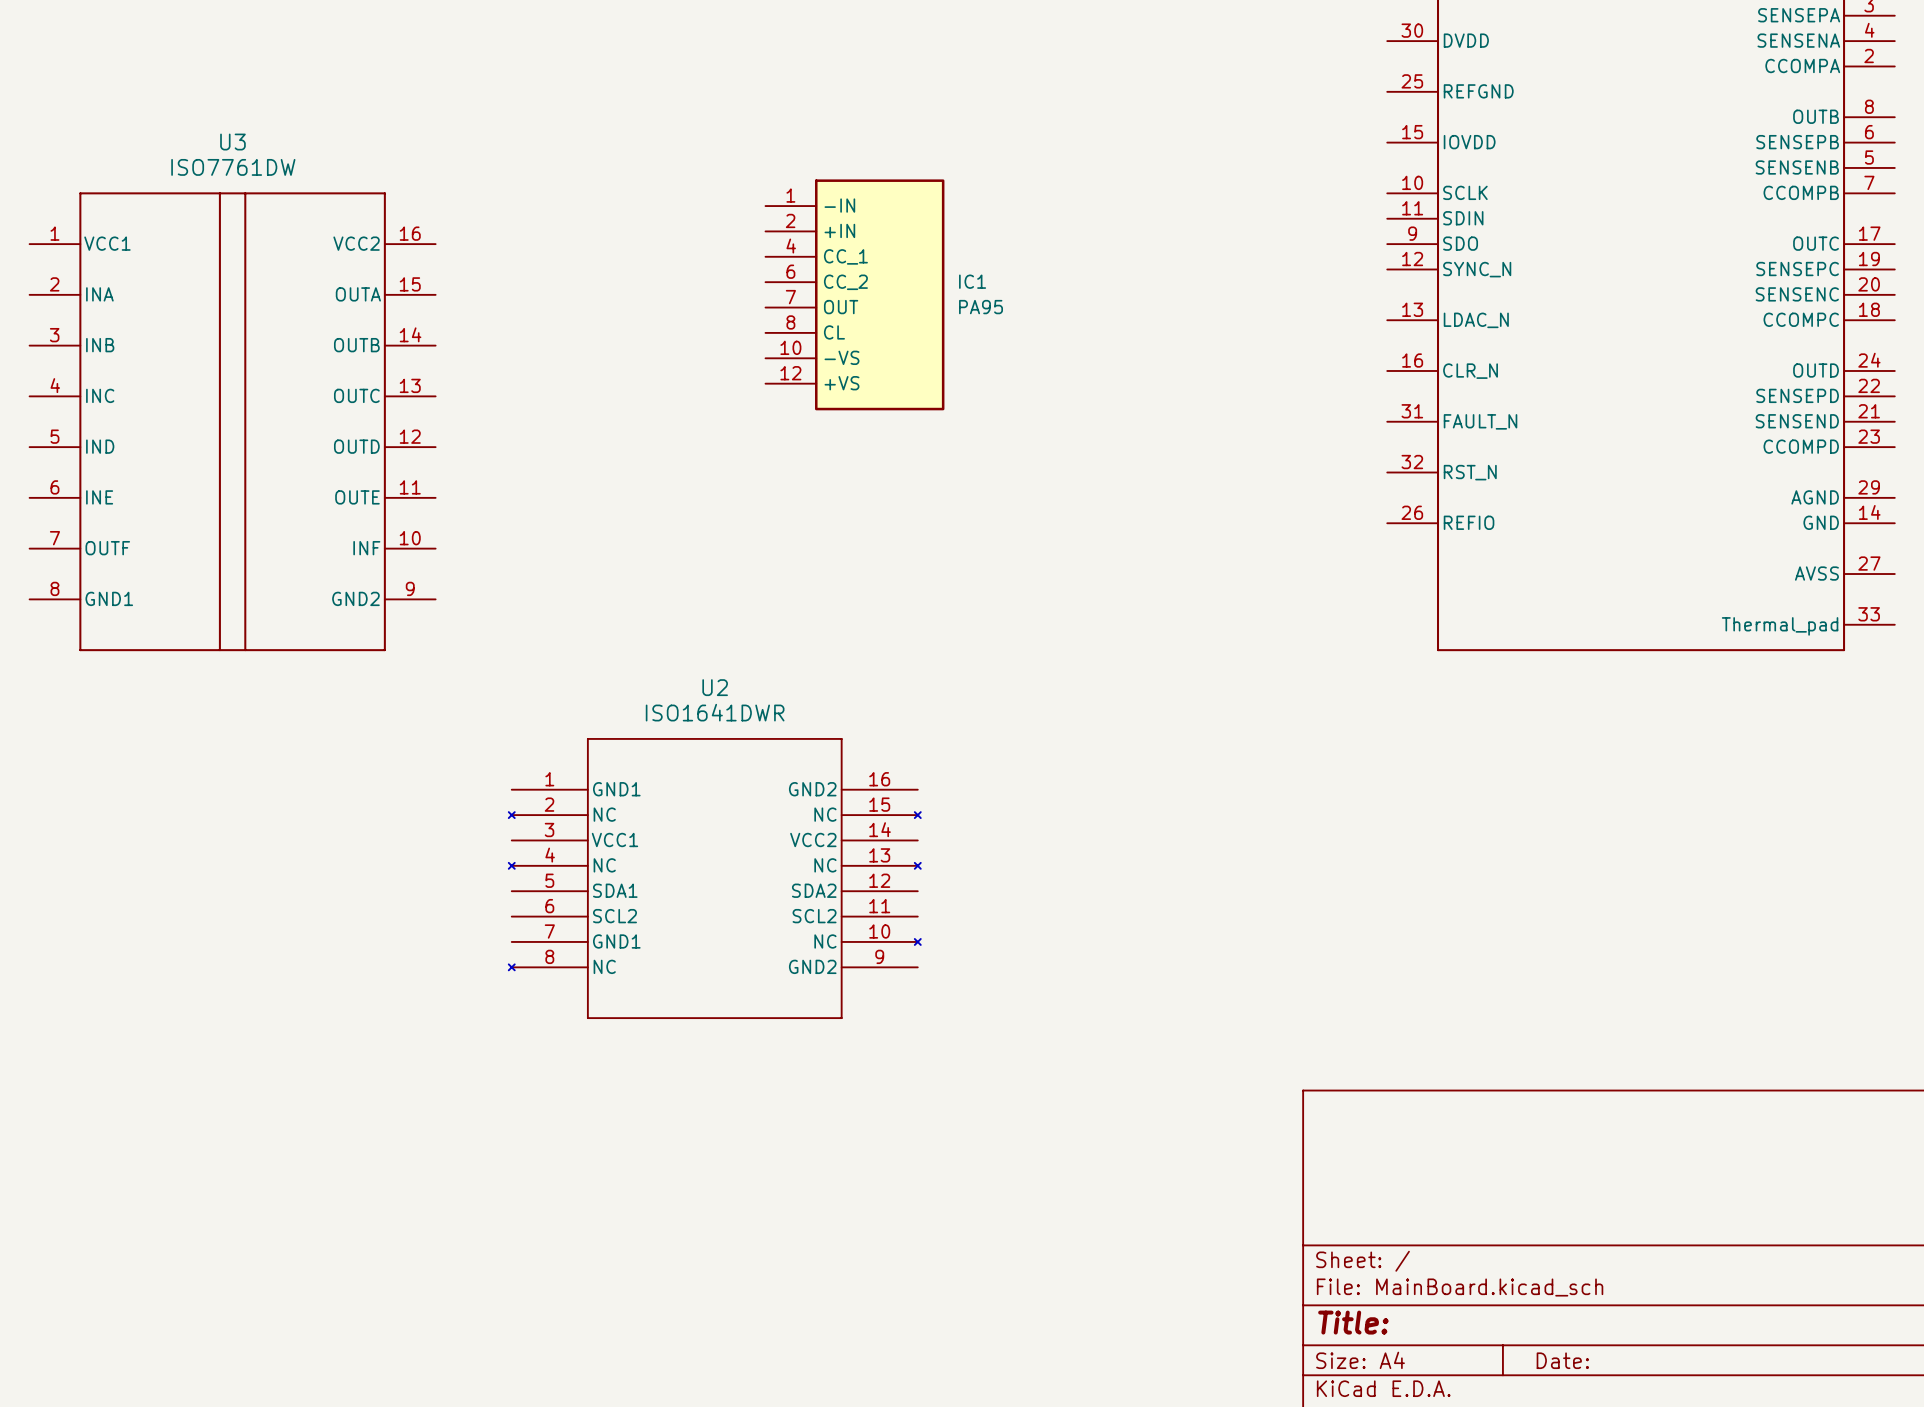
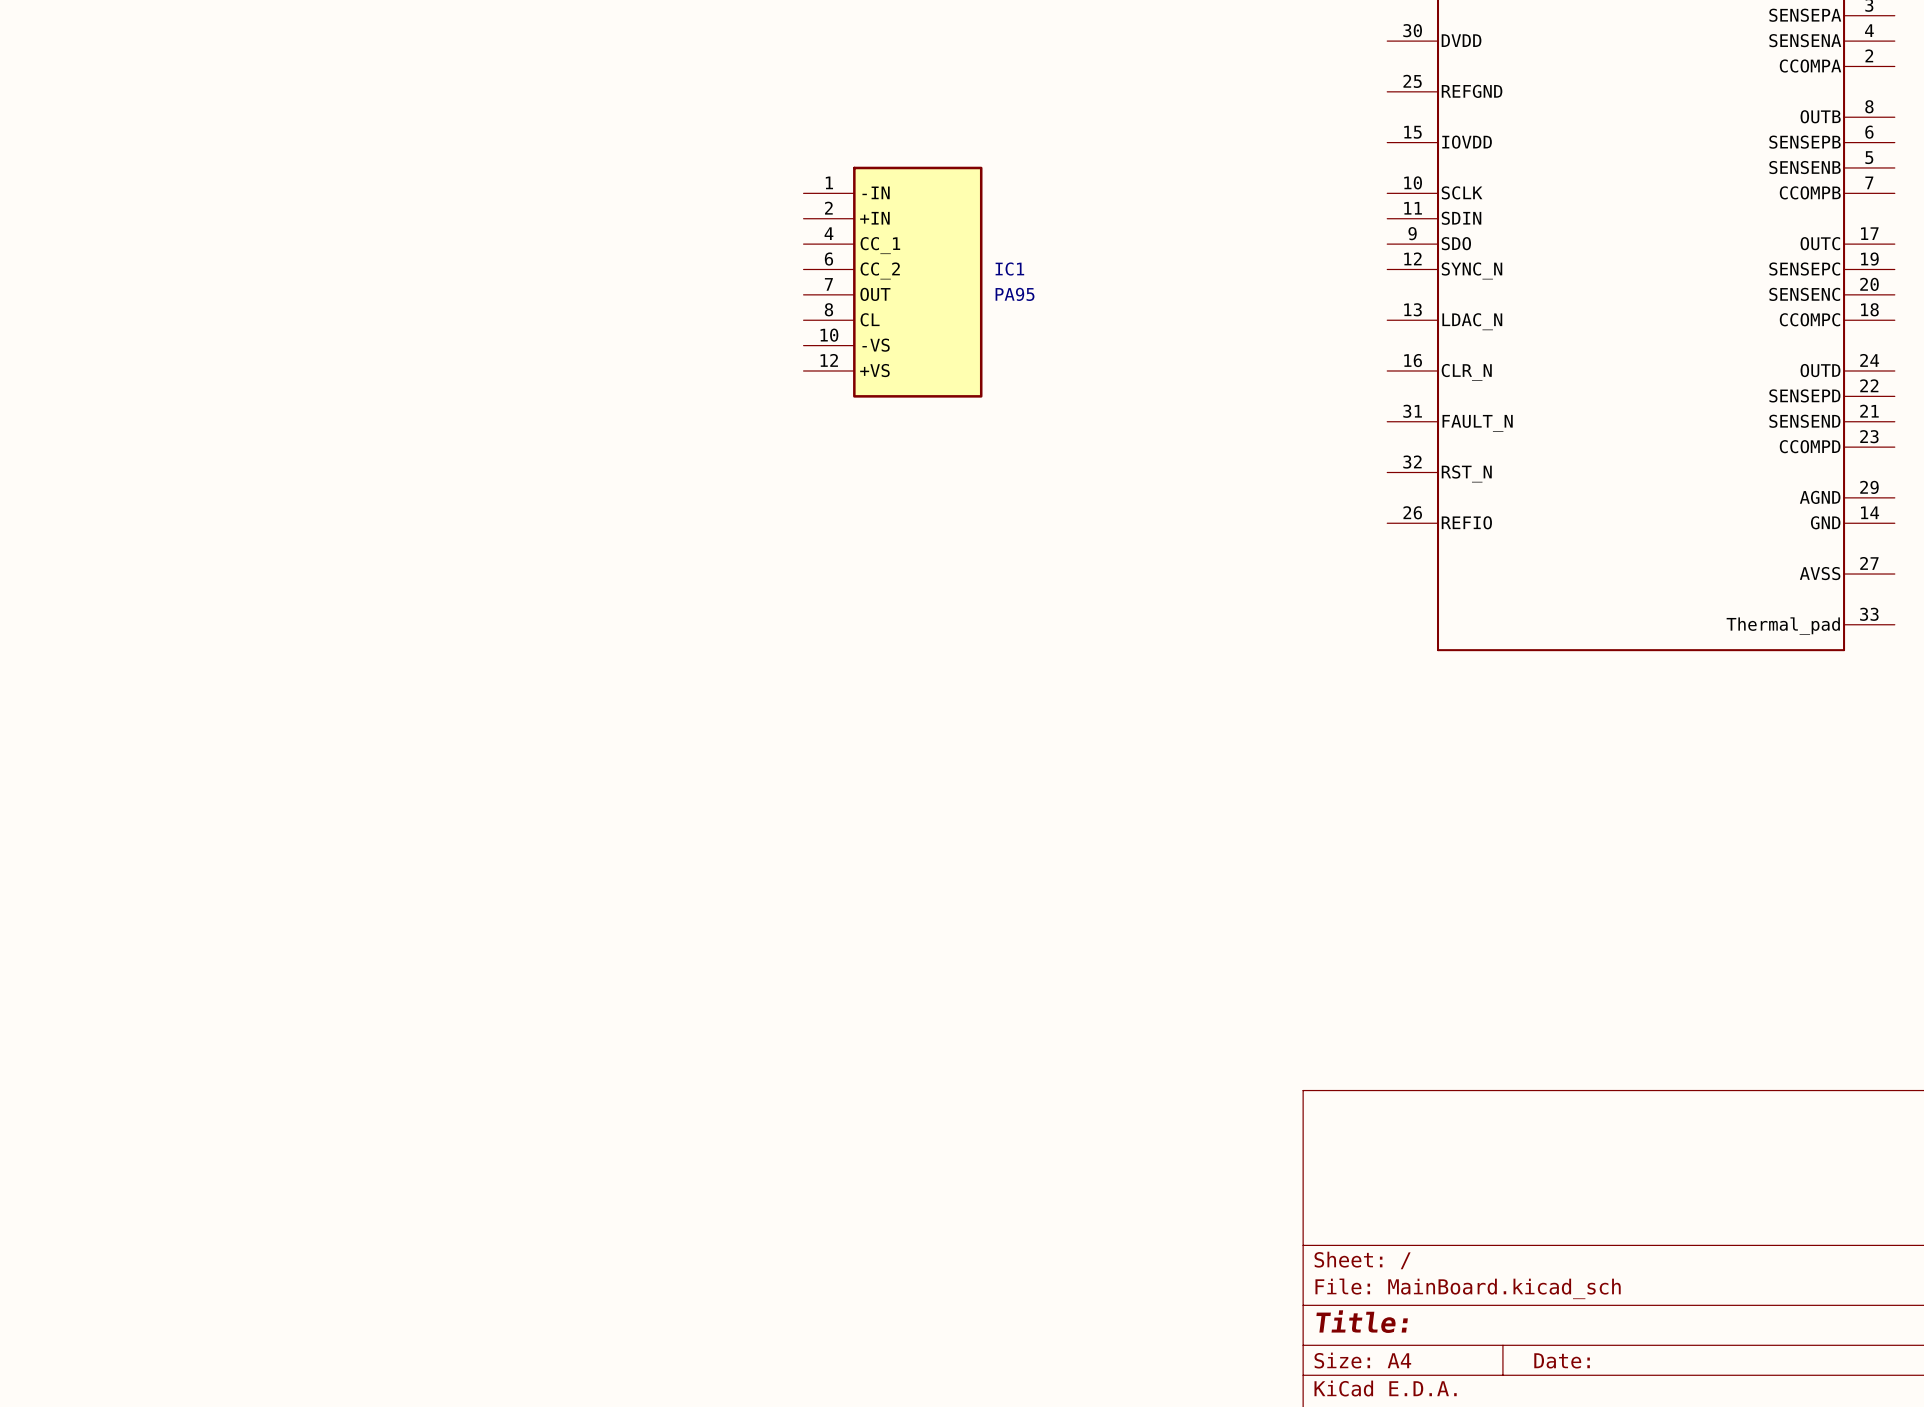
IC1 position: (854, 294) -> (893, 282)
U3: ISO7761DW (232, 421) -> none
U2: ISO1641DWR (714, 878) -> none

